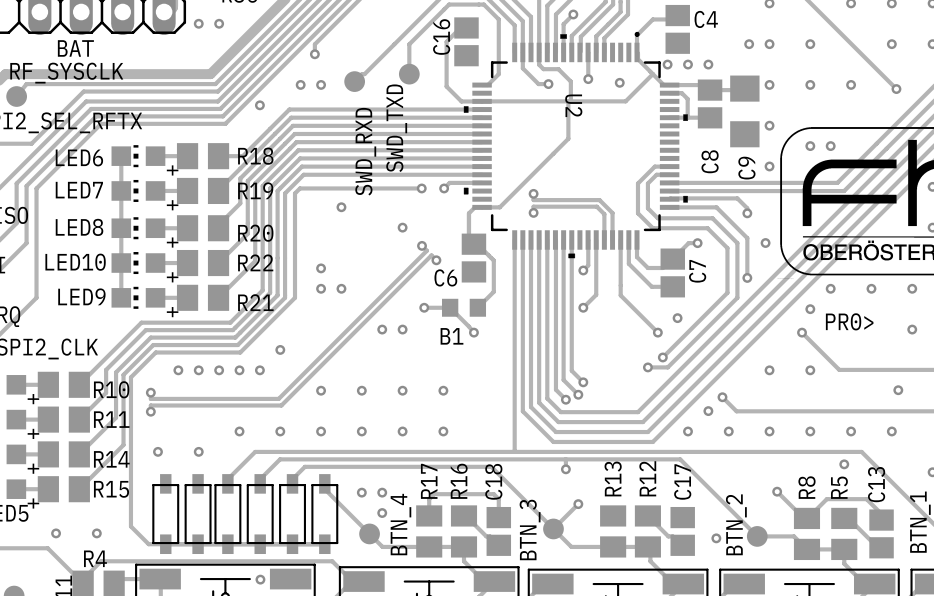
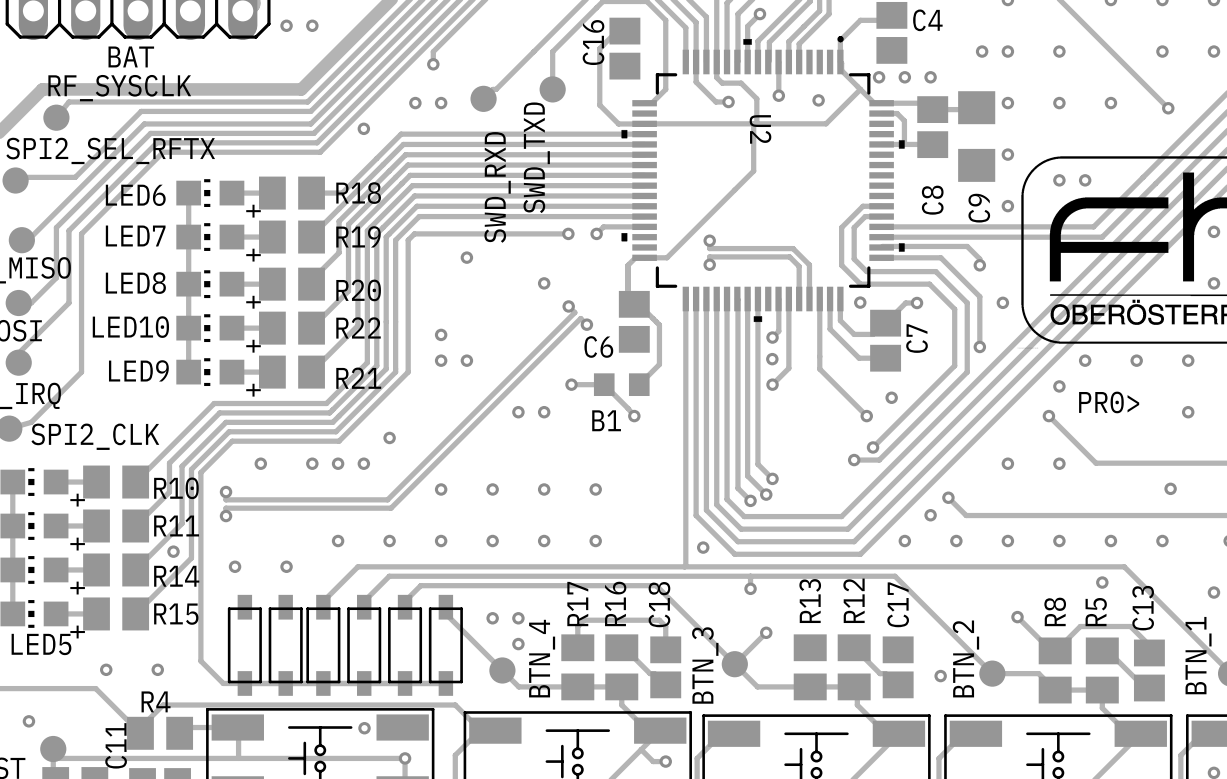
via: none -> (860, 302)
via: none -> (772, 359)
via: (198, 370) -> none
via: none -> (703, 547)
via: none -> (173, 551)

